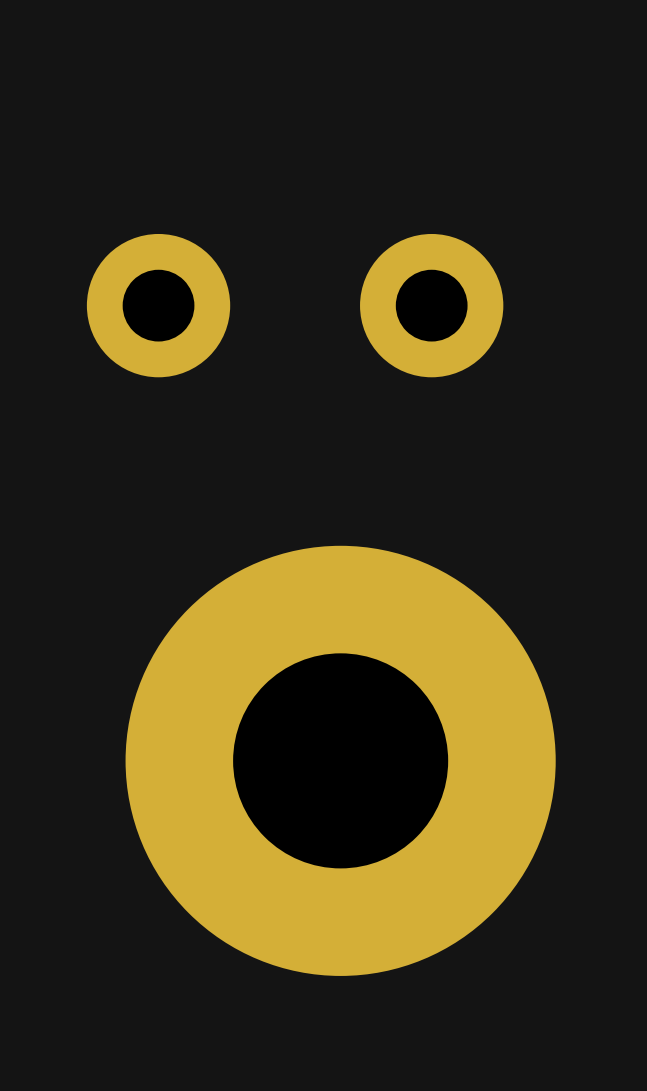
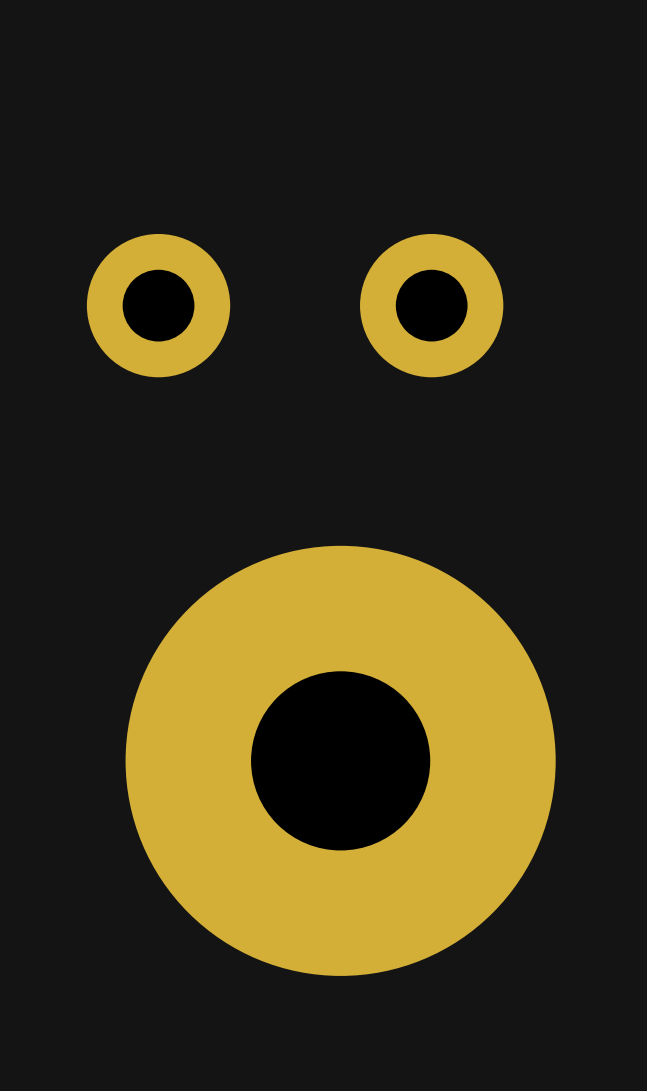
part footprint: [125, 545, 556, 976] -> [125, 545, 556, 976]

